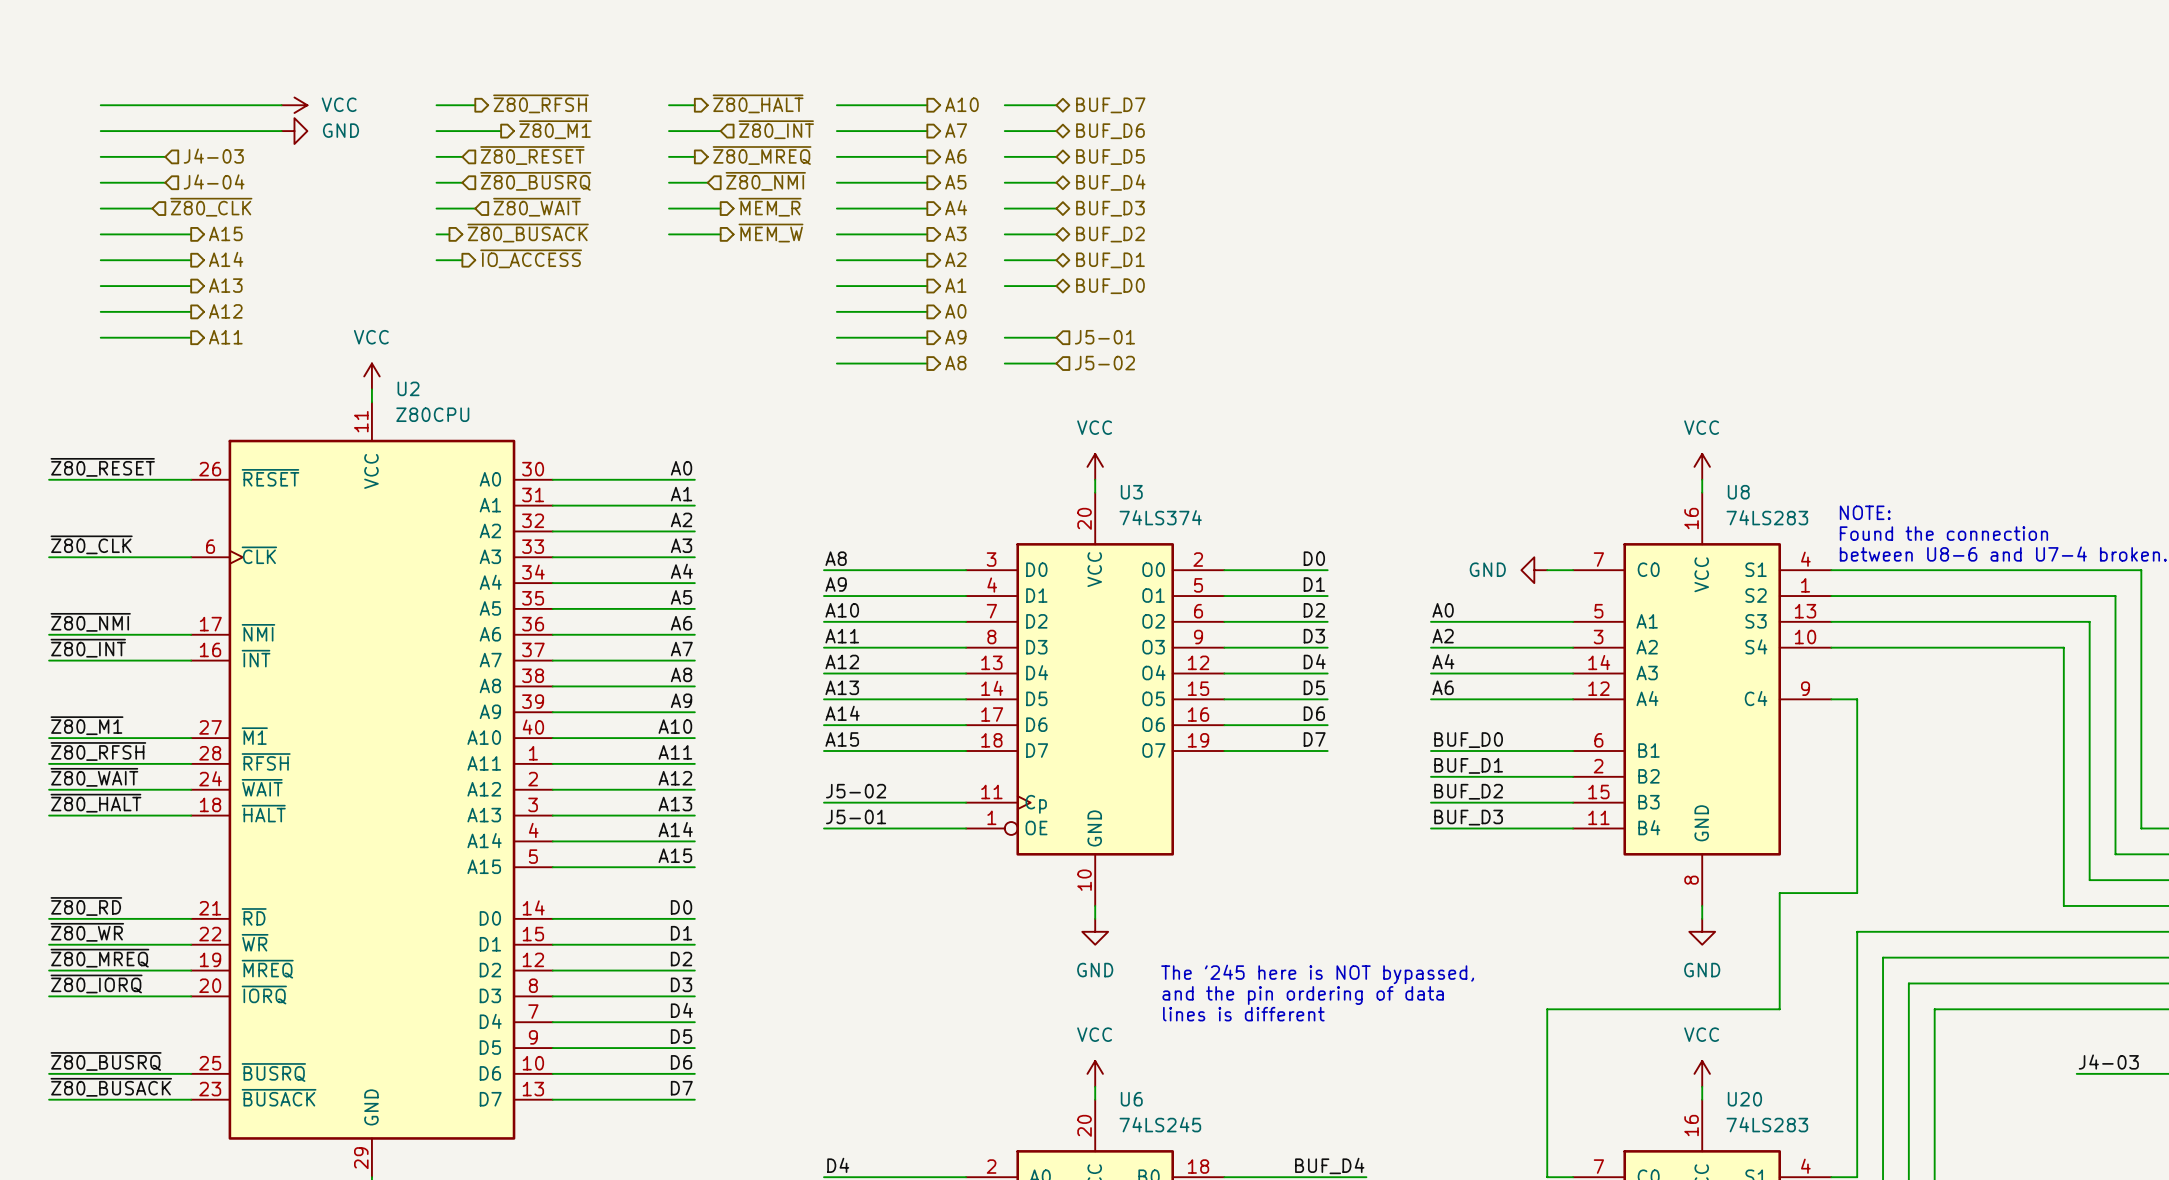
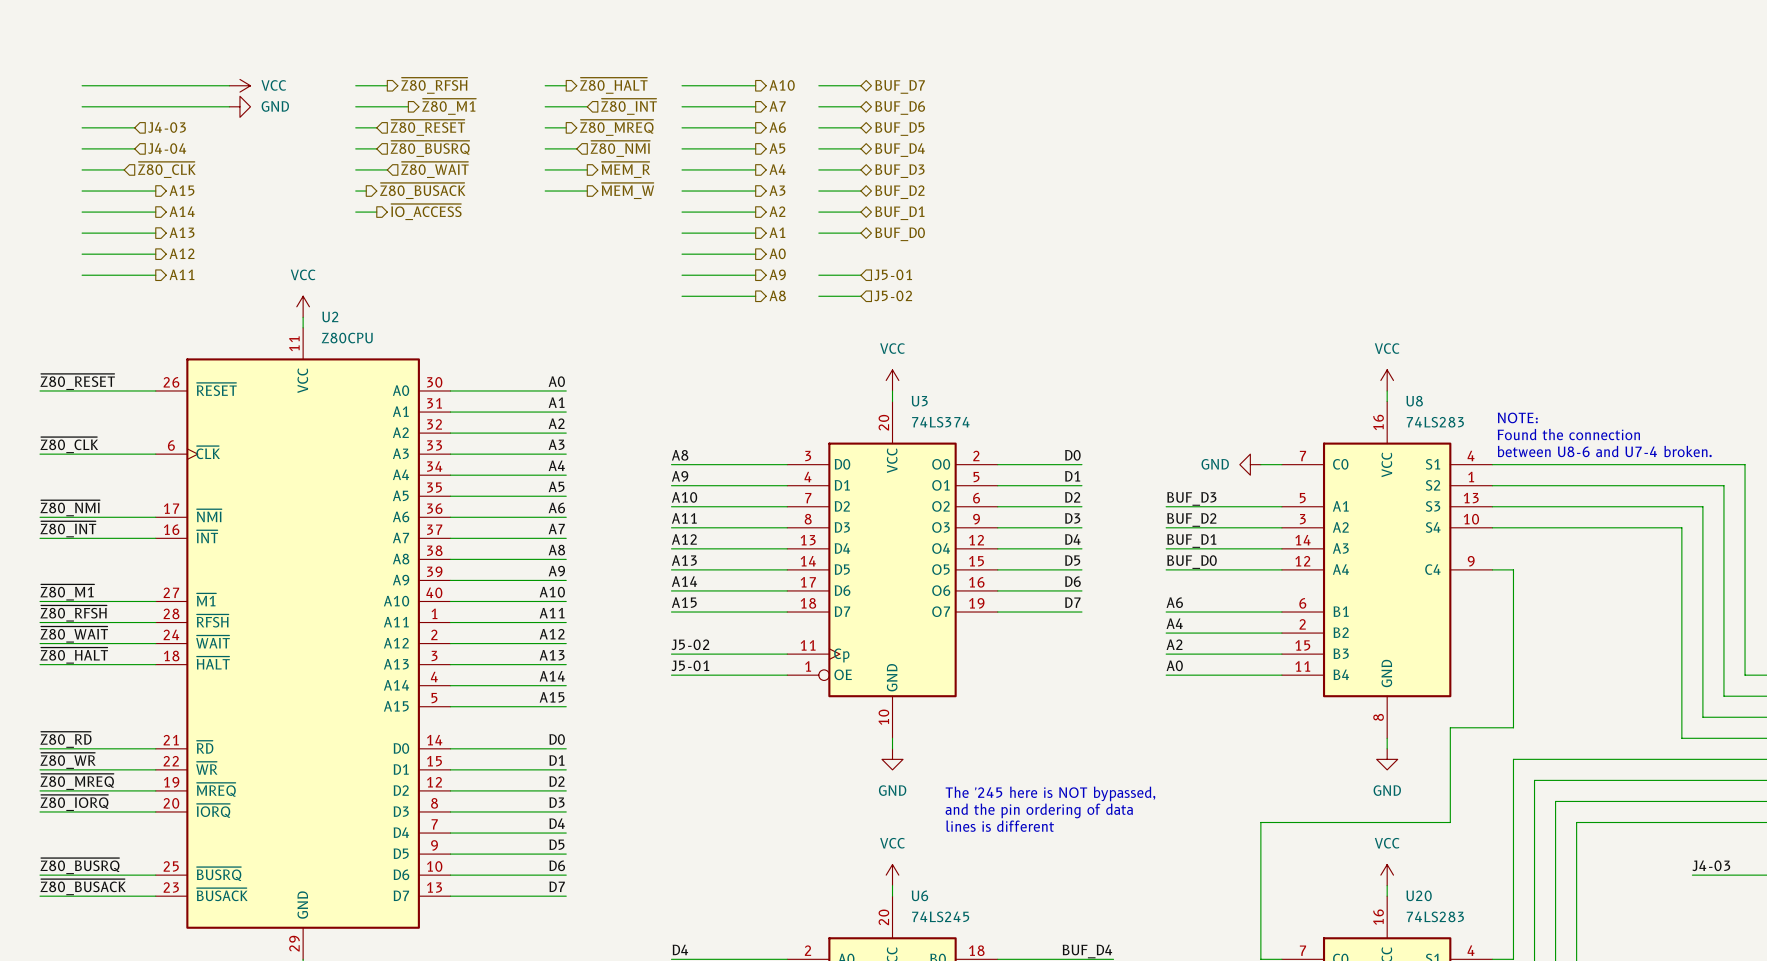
label: A0 (1443, 610) -> BUF_D3 (1191, 498)
label: A2 (1443, 636) -> BUF_D2 (1191, 519)
label: A4 (1443, 661) -> BUF_D1 (1191, 541)
label: A6 (1443, 687) -> BUF_D0 (1192, 562)
label: BUF_D0 (1468, 740) -> A6 (1174, 602)
label: BUF_D1 (1468, 765) -> A4 (1174, 623)
label: BUF_D2 (1468, 791) -> A2 (1174, 644)
label: BUF_D3 (1468, 817) -> A0 (1174, 665)

